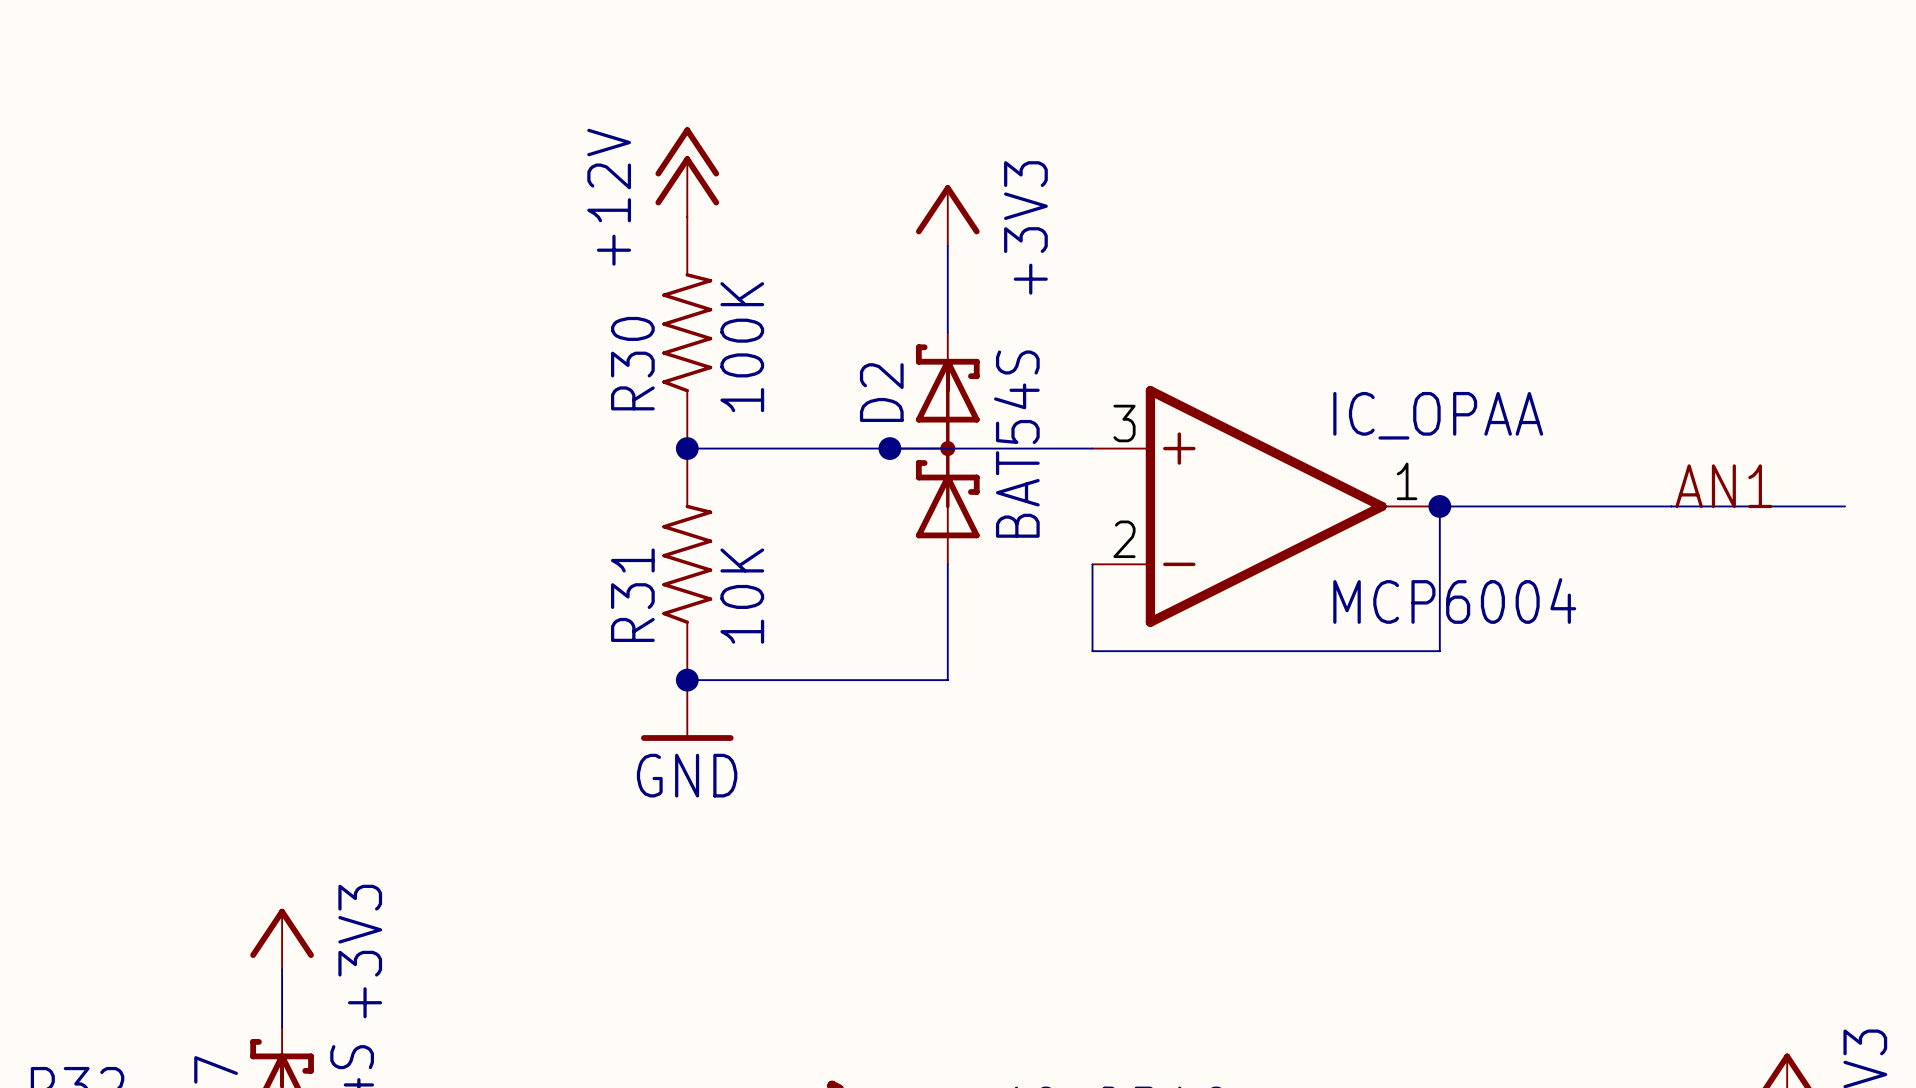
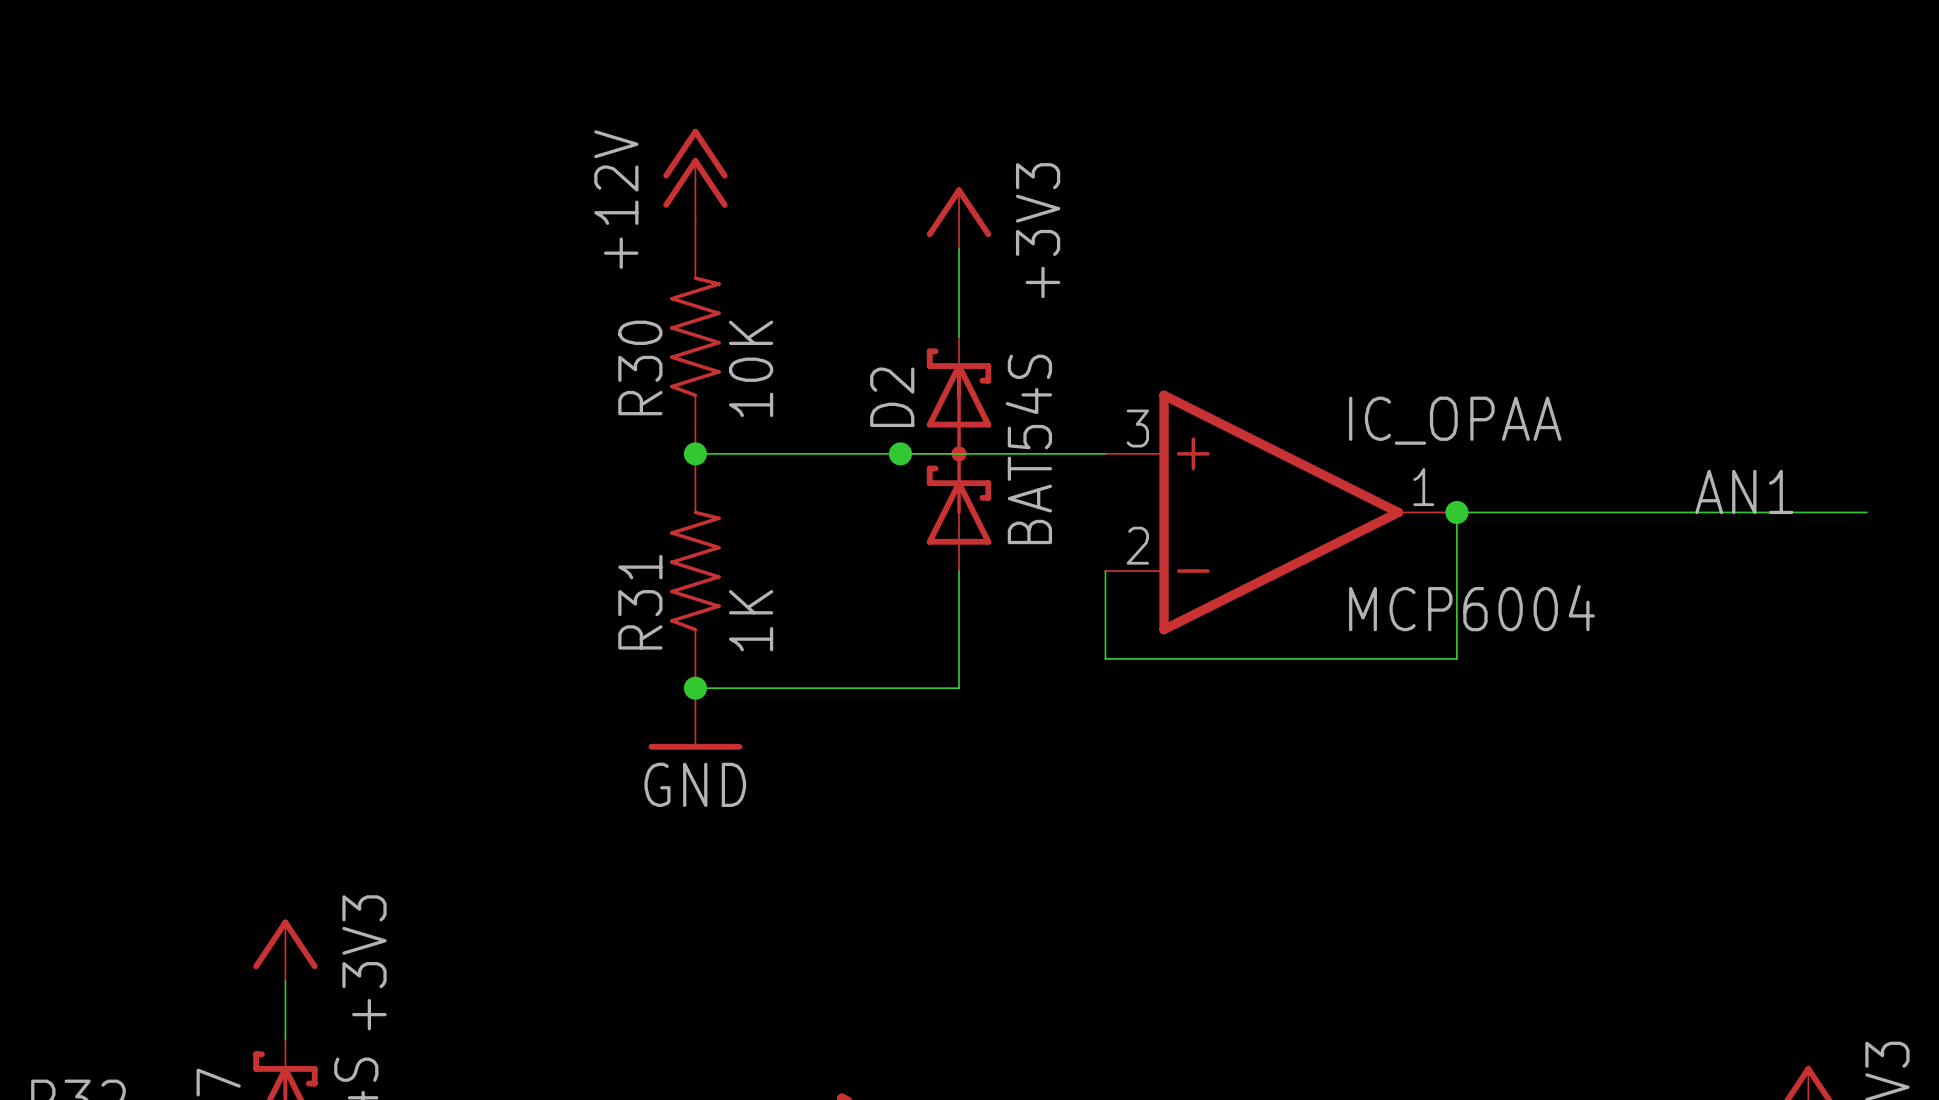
R30 value: 100K (742, 347) -> 10K (751, 368)
R31 value: 10K (742, 596) -> 1K (751, 620)

